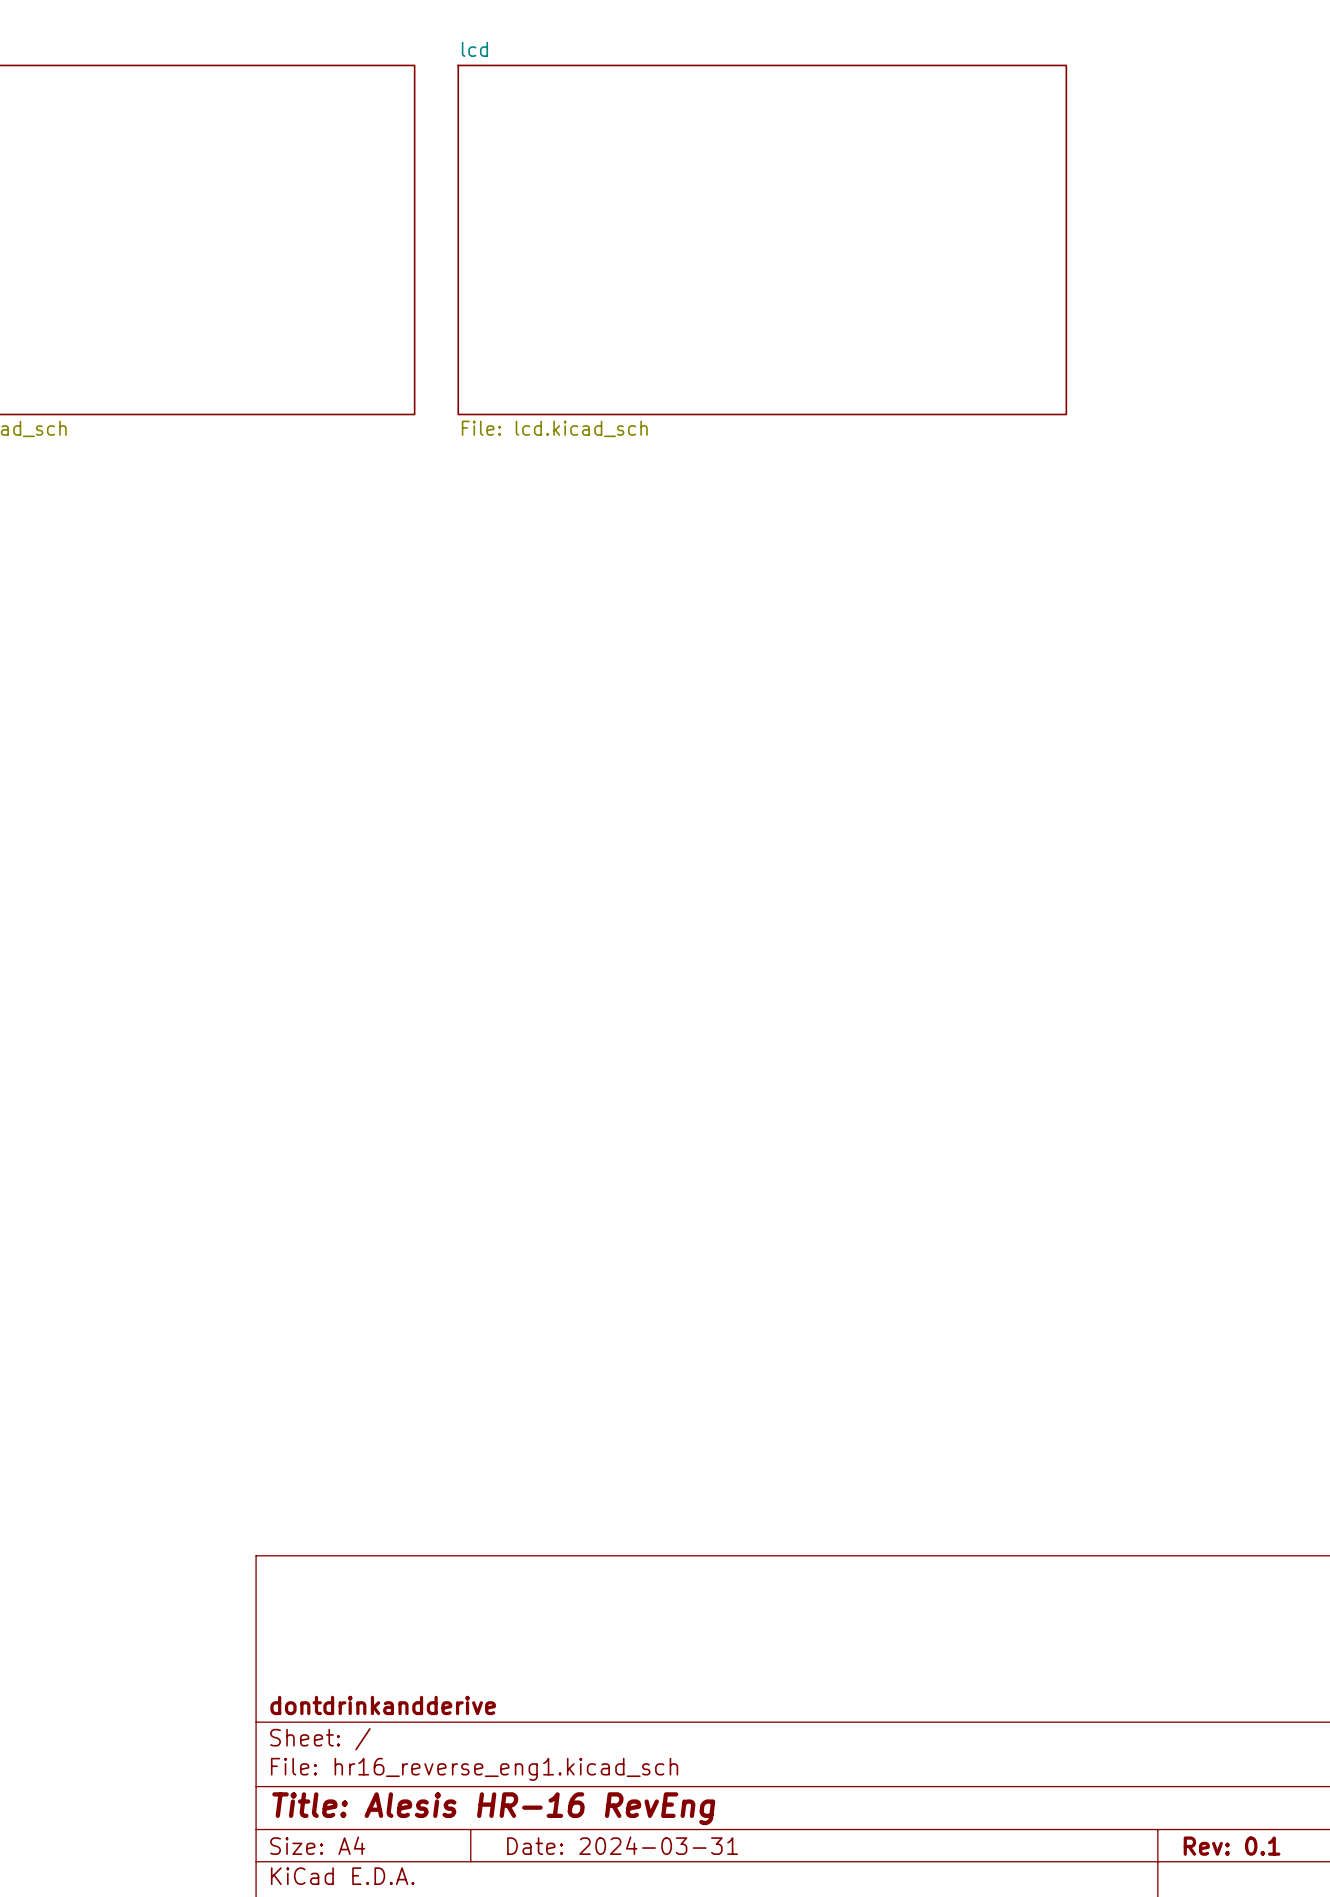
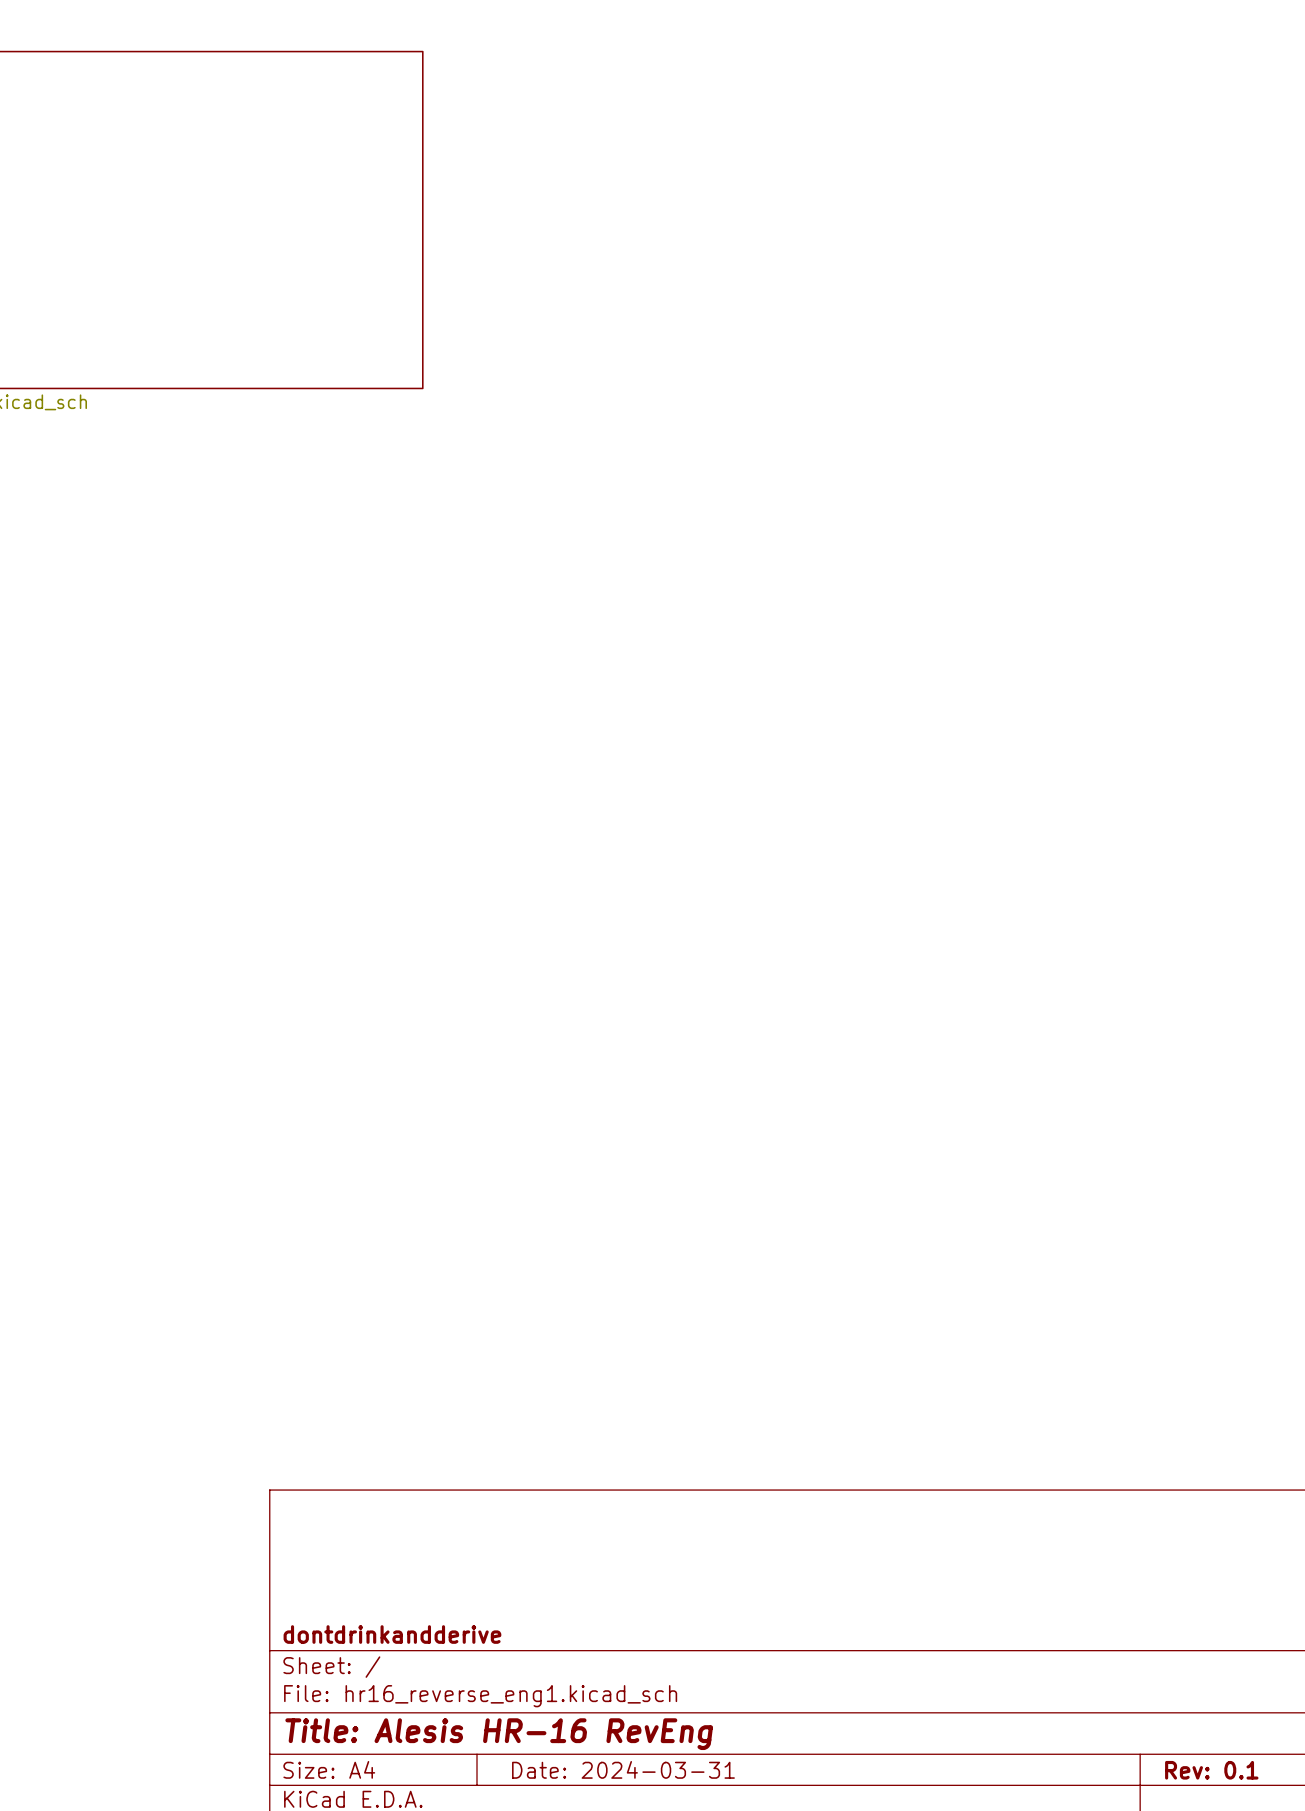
sheet lcd: File: lcd.kicad_sch (762, 239) -> none

